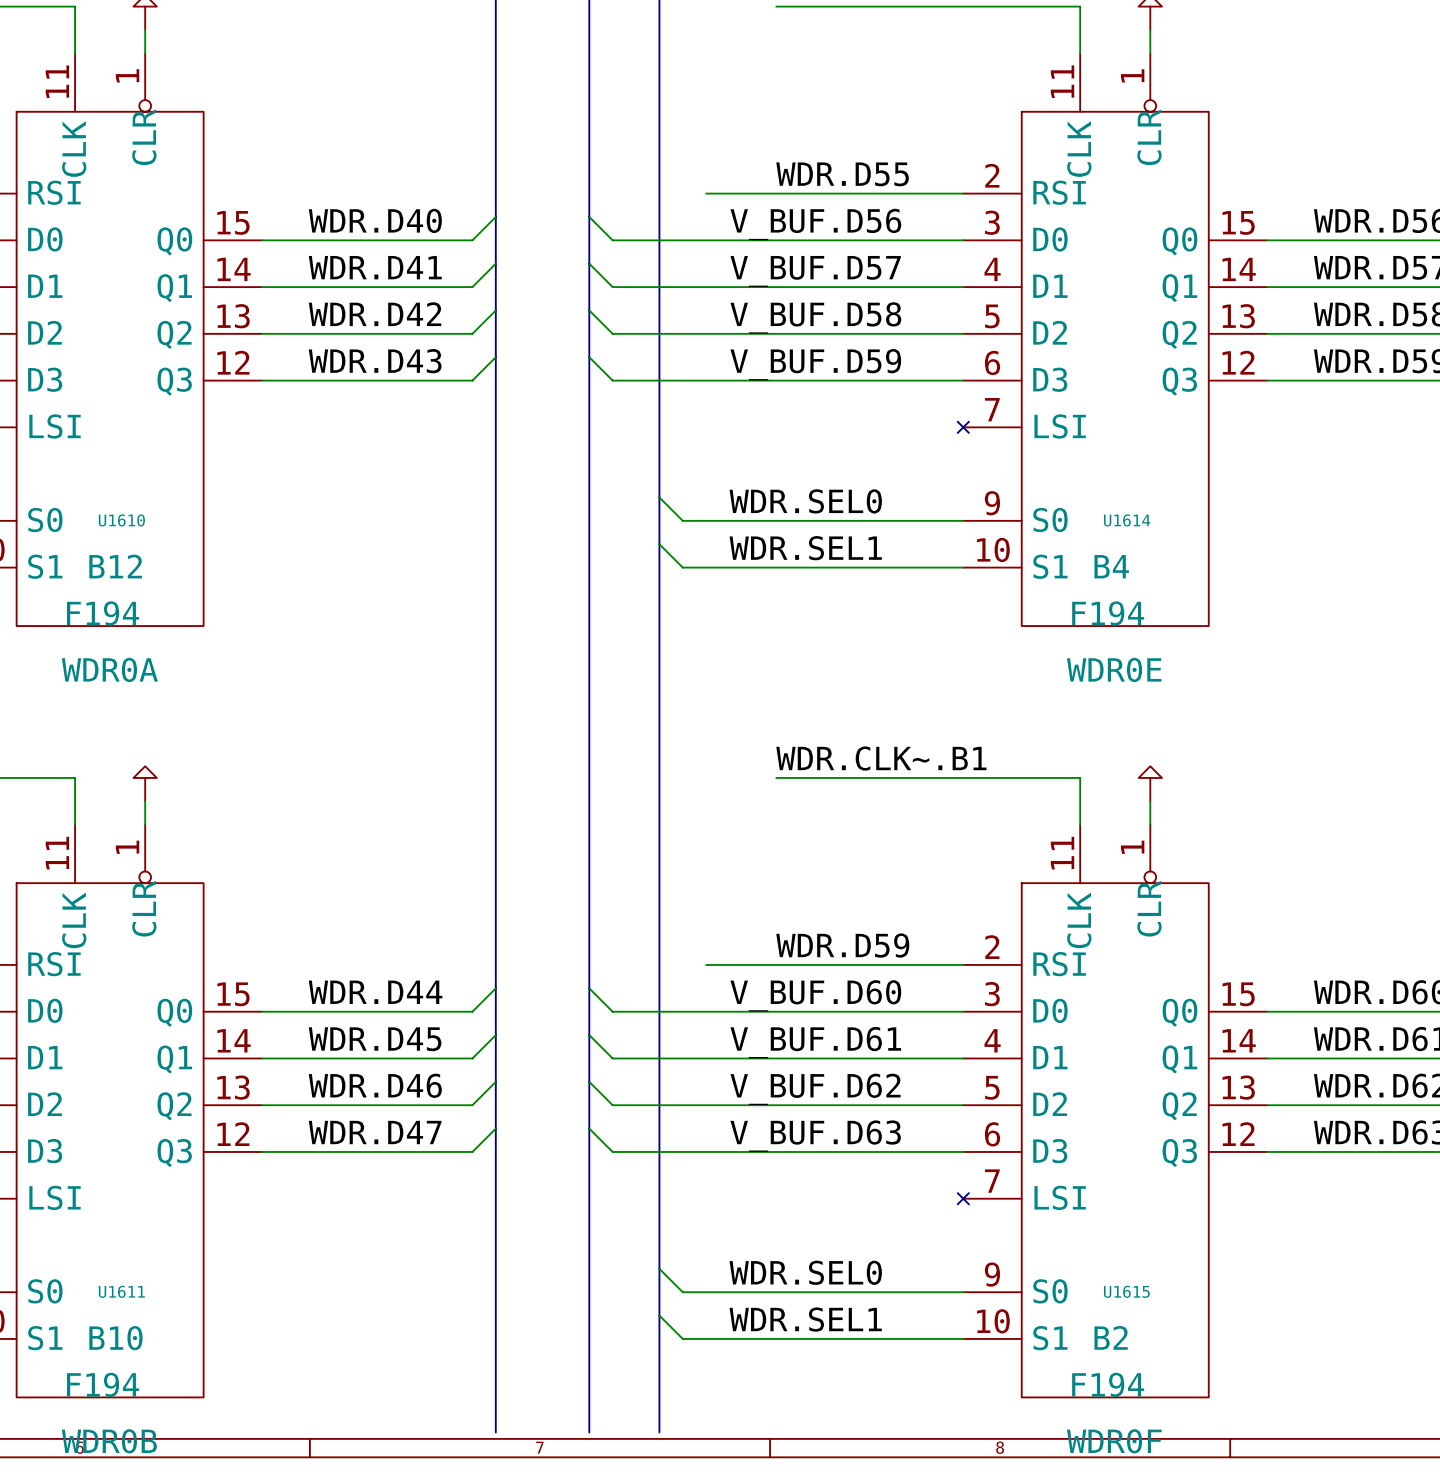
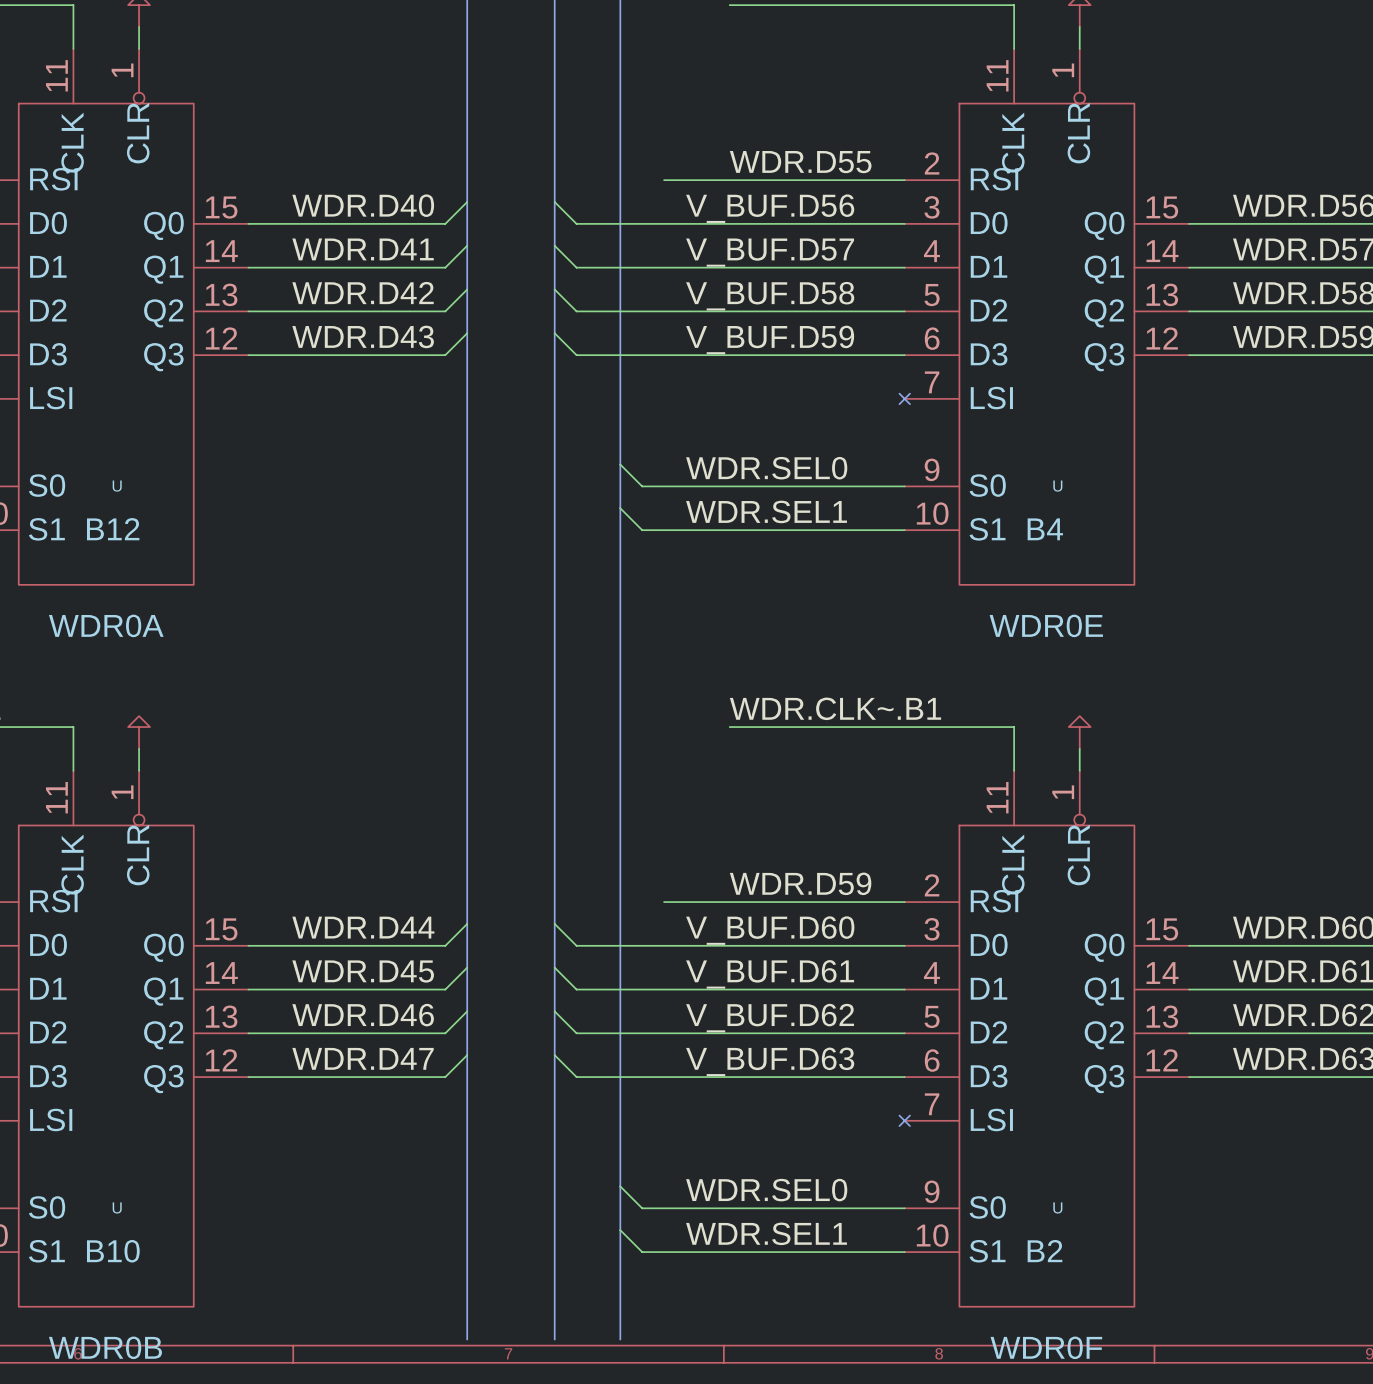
U1610 name: U1610 (121, 520) -> U (117, 486)
U1614 name: U1614 (1127, 520) -> U (1057, 486)
U1610 value: F194 (103, 613) -> none
U1614 value: F194 (1108, 613) -> none
U1611 name: U1611 (121, 1291) -> U (117, 1207)
U1615 name: U1615 (1126, 1291) -> U (1057, 1207)
U1611 value: F194 (103, 1384) -> none
U1615 value: F194 (1108, 1384) -> none

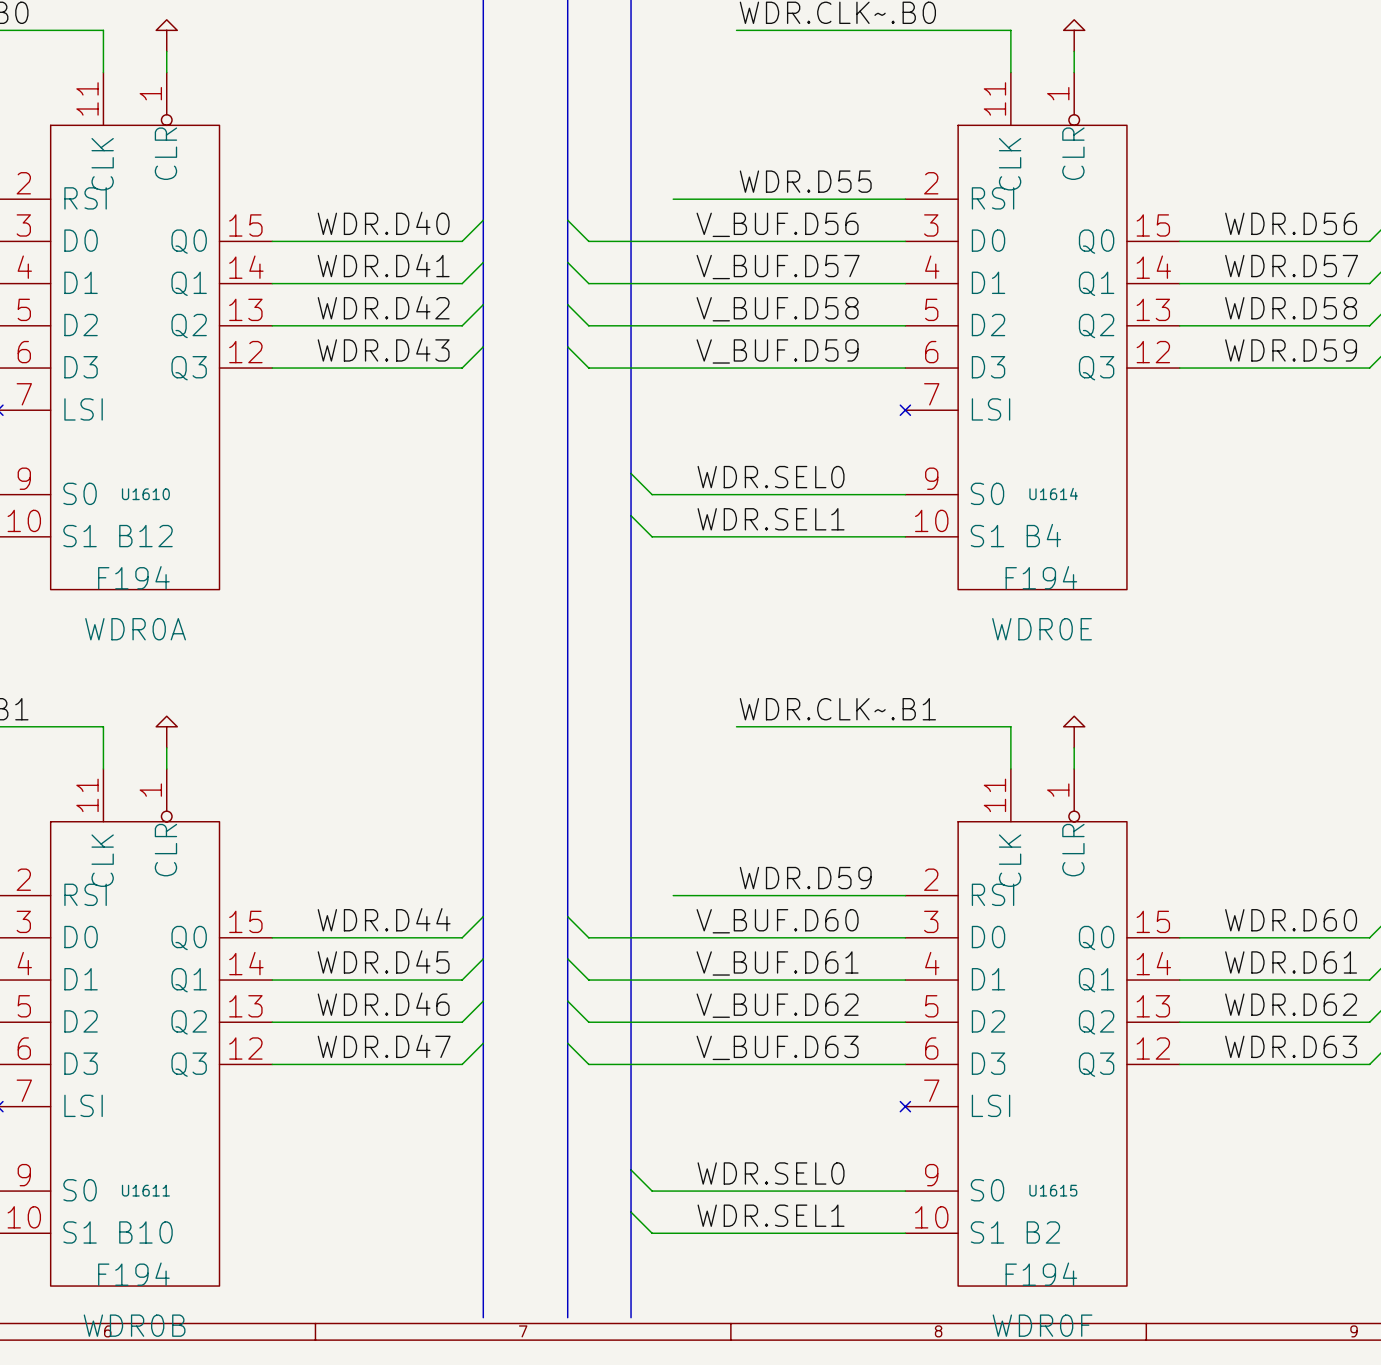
U name: U (117, 486) -> U1610 (145, 494)
U name: U (1057, 486) -> U1614 (1053, 493)
U value: none -> F194 (133, 577)
U value: none -> F194 (1041, 577)
U name: U (117, 1207) -> U1611 (145, 1190)
U name: U (1057, 1207) -> U1615 (1053, 1190)
U value: none -> F194 (133, 1274)
U value: none -> F194 (1041, 1274)

